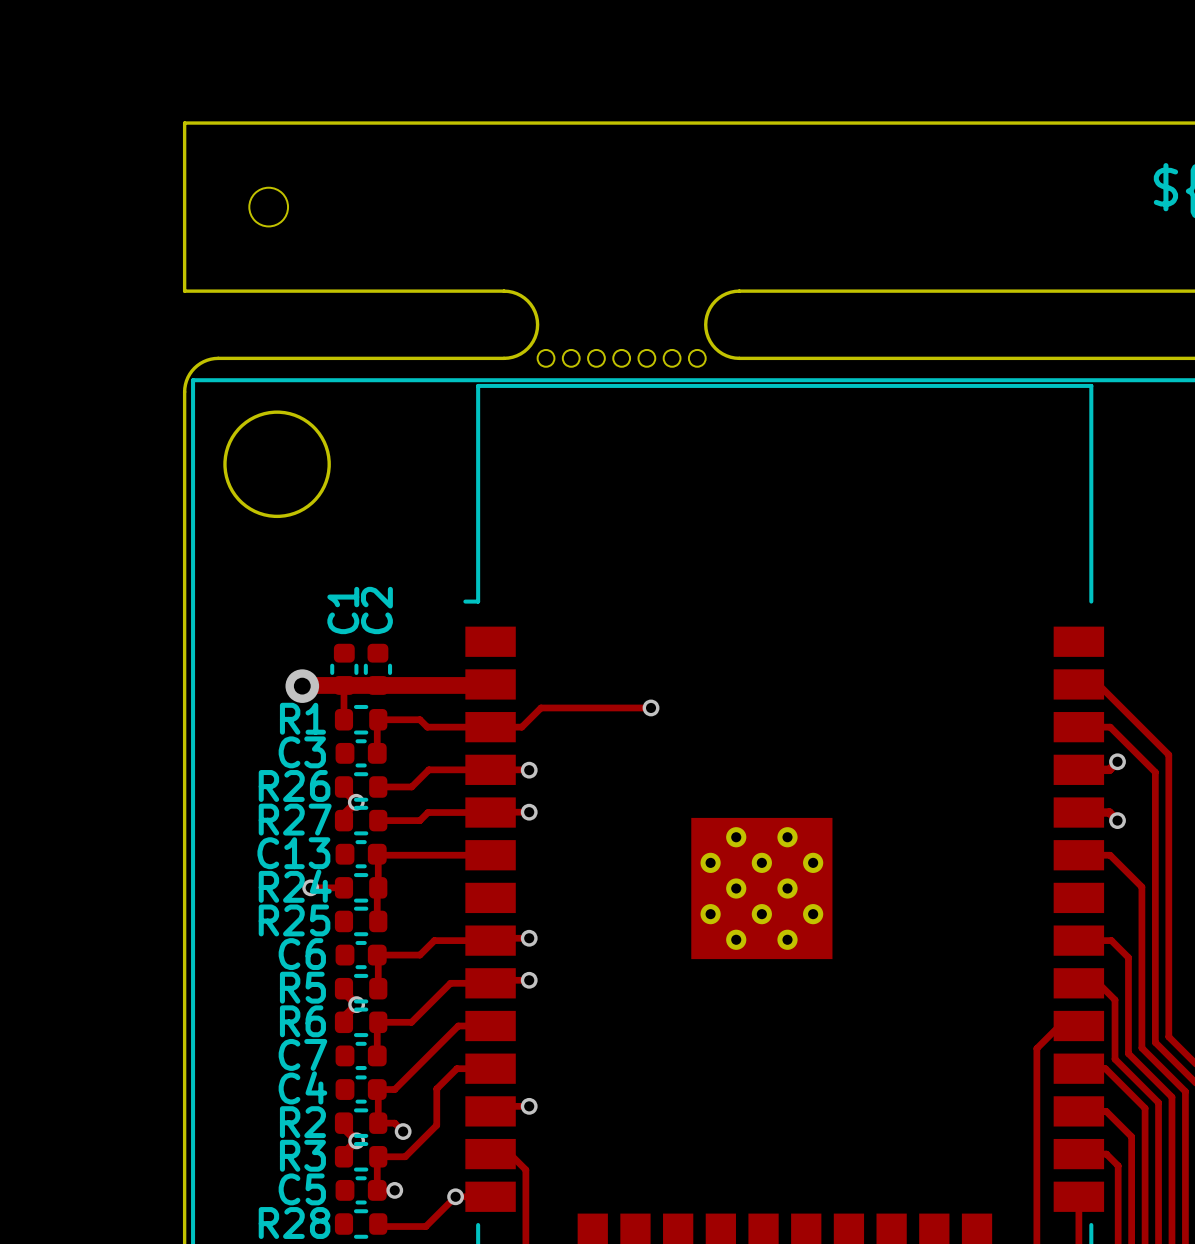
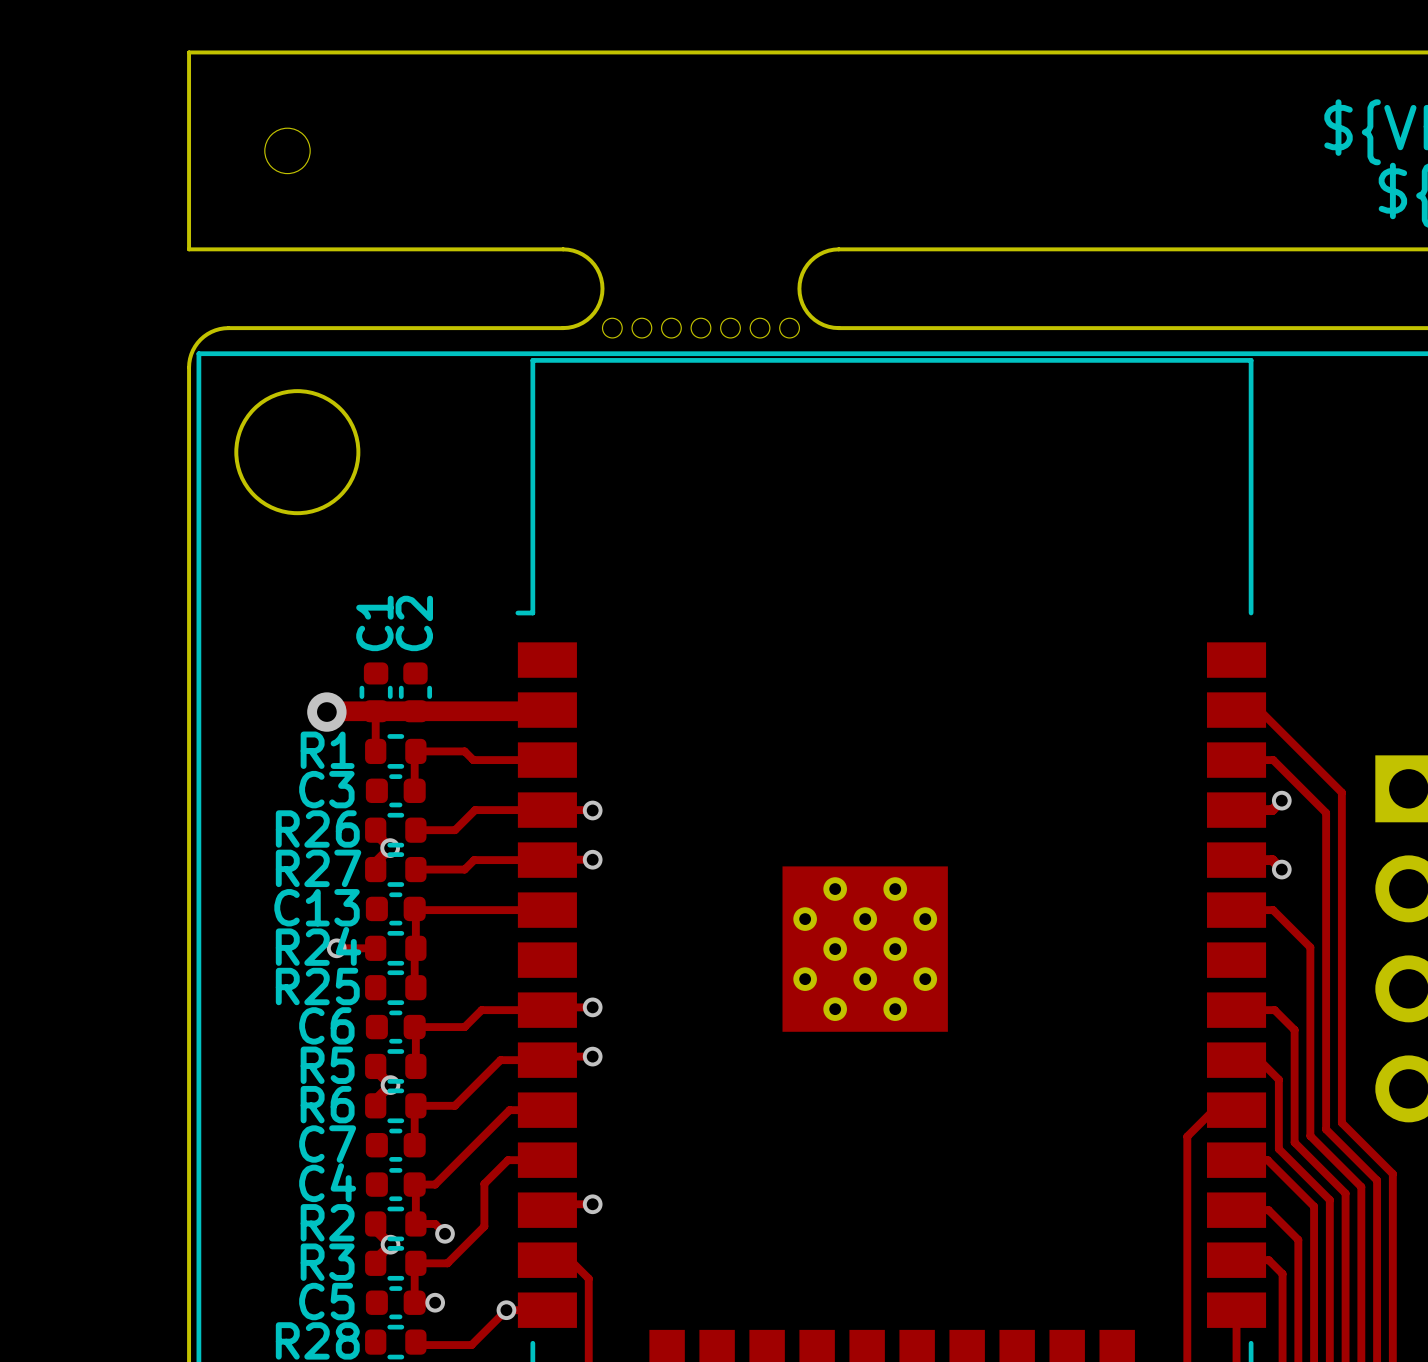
track: (651, 707) (541, 707) (521, 727) (490, 727) -> none
via: (651, 707) -> none

